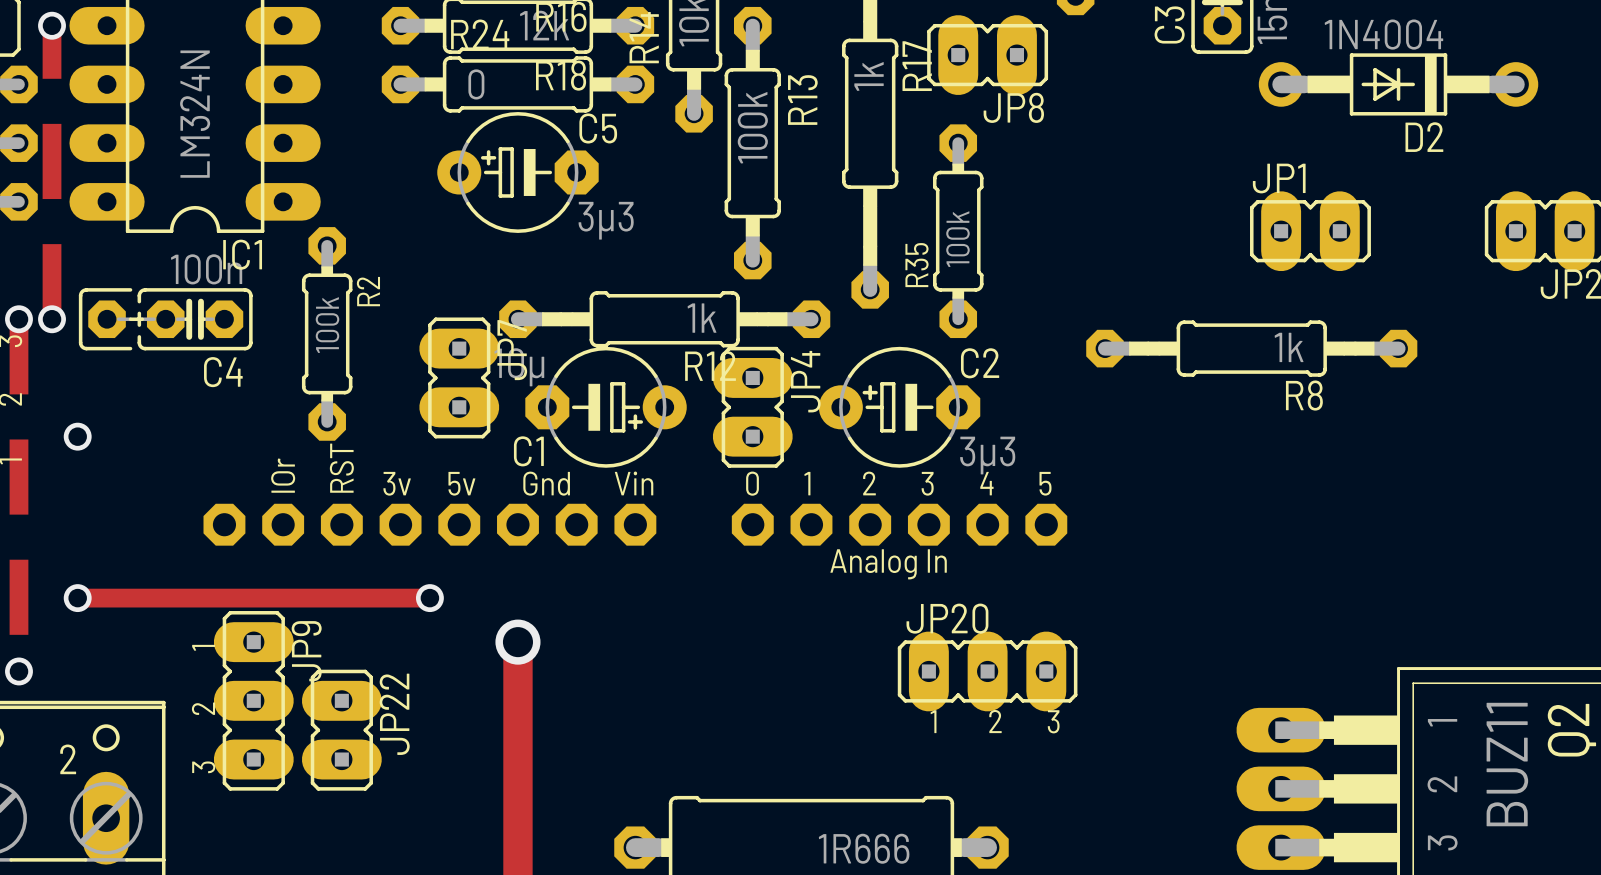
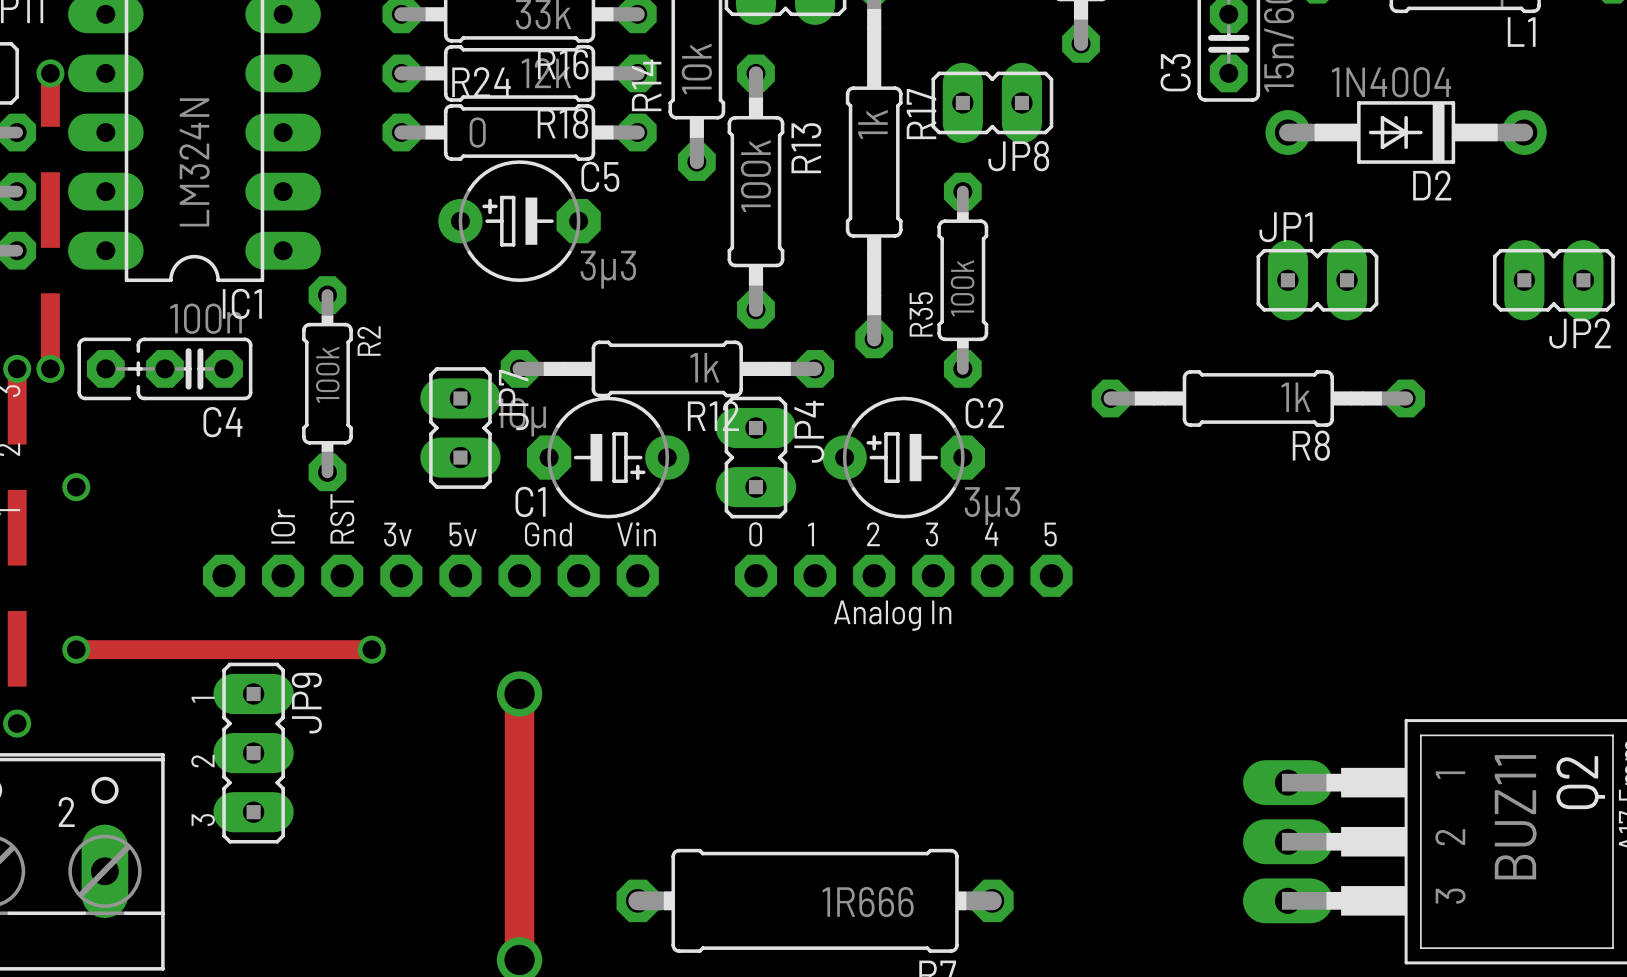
track: (371, 598) (429, 598) -> none
via position: (429, 598) -> (371, 649)
JP20: (987, 671) -> none
JP22: (341, 730) -> none

